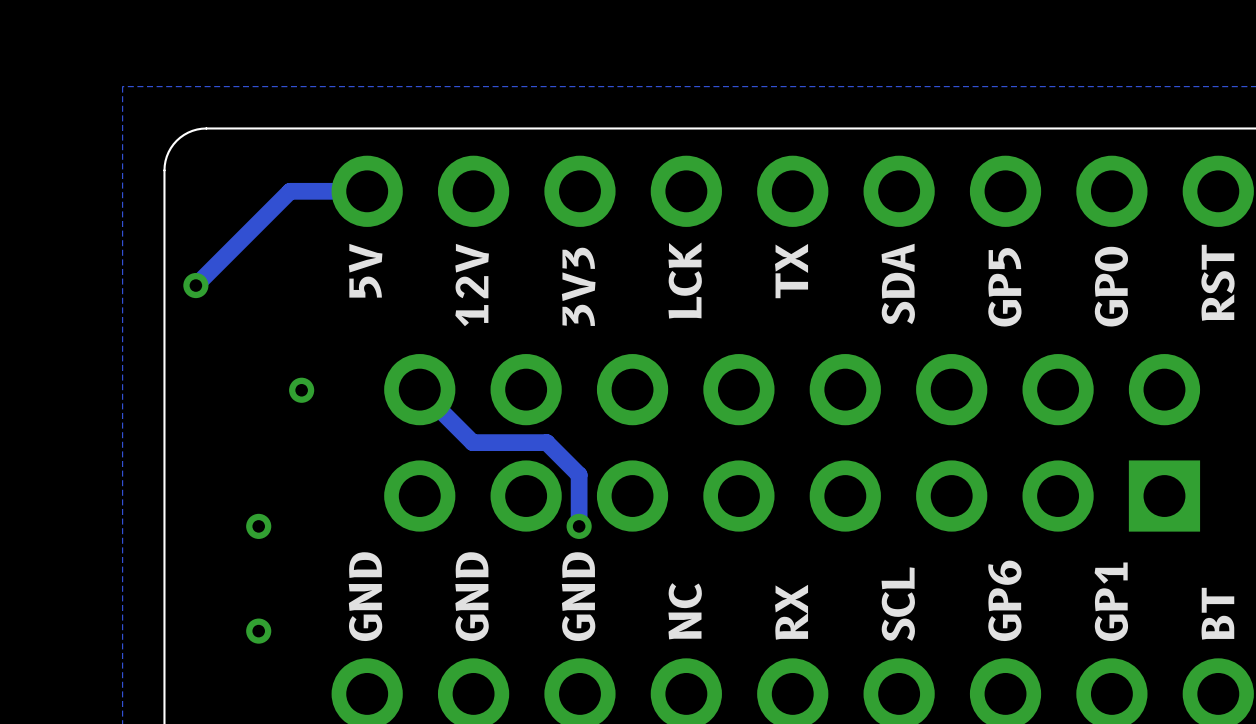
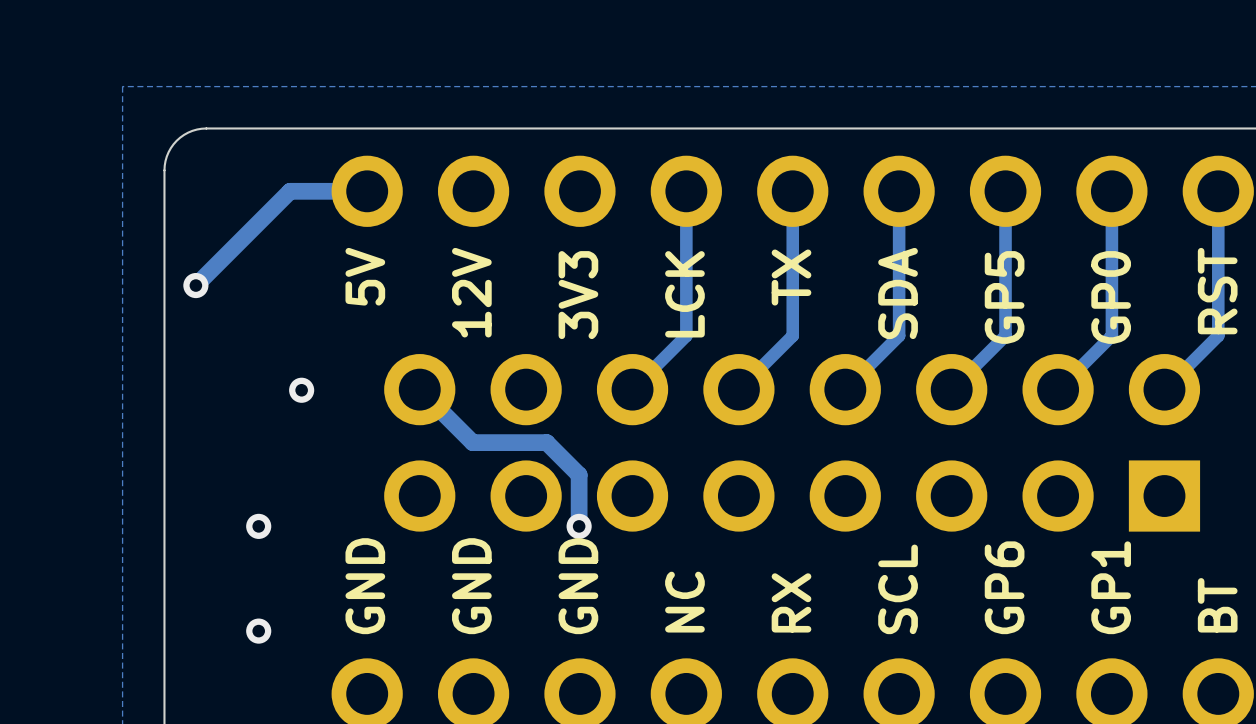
track: none -> (686, 191) (686, 335) (632, 389)
track: none -> (792, 191) (792, 335) (738, 389)
track: none -> (899, 191) (899, 335) (845, 389)
track: none -> (1005, 191) (1005, 335) (951, 389)
track: none -> (1111, 191) (1111, 335) (1058, 389)
track: none -> (1218, 191) (1218, 335) (1164, 389)

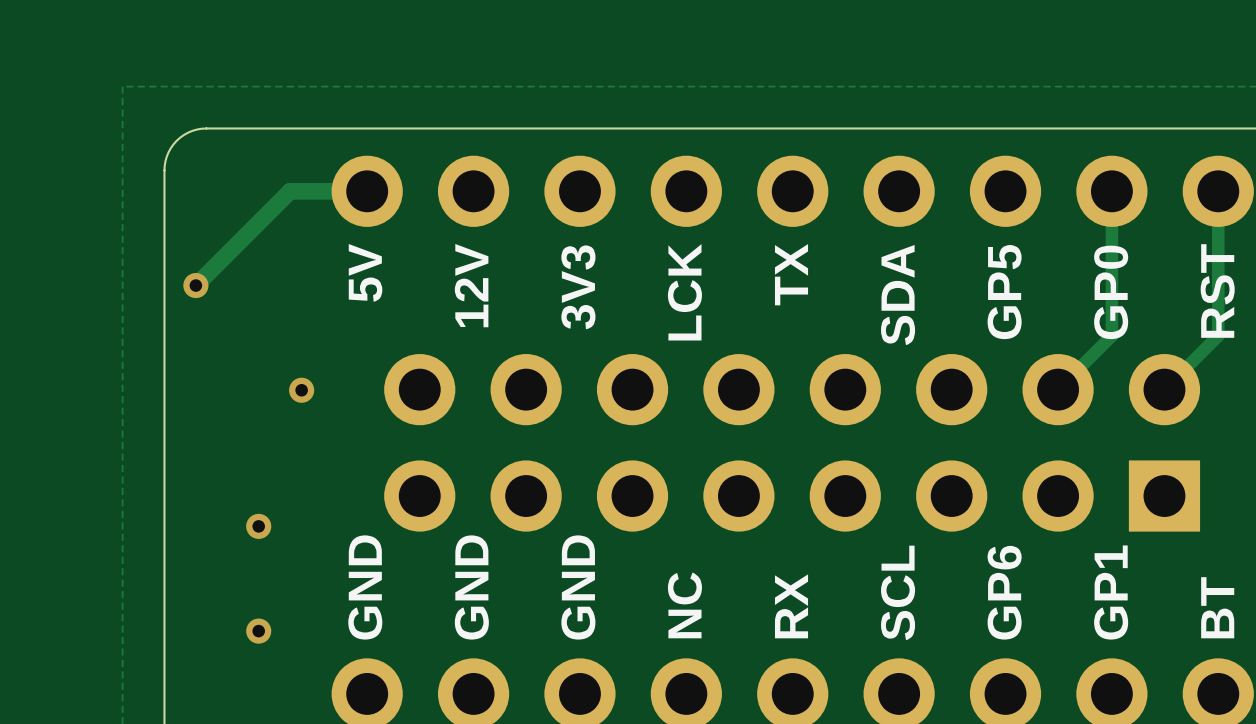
track: (686, 191) (686, 335) (632, 389) -> none
track: (792, 191) (792, 335) (738, 389) -> none
track: (899, 191) (899, 335) (845, 389) -> none
track: (1005, 191) (1005, 335) (951, 389) -> none
track: (419, 389) (472, 442) (546, 442) (579, 474) (579, 526) -> none
via: (579, 526) -> none

